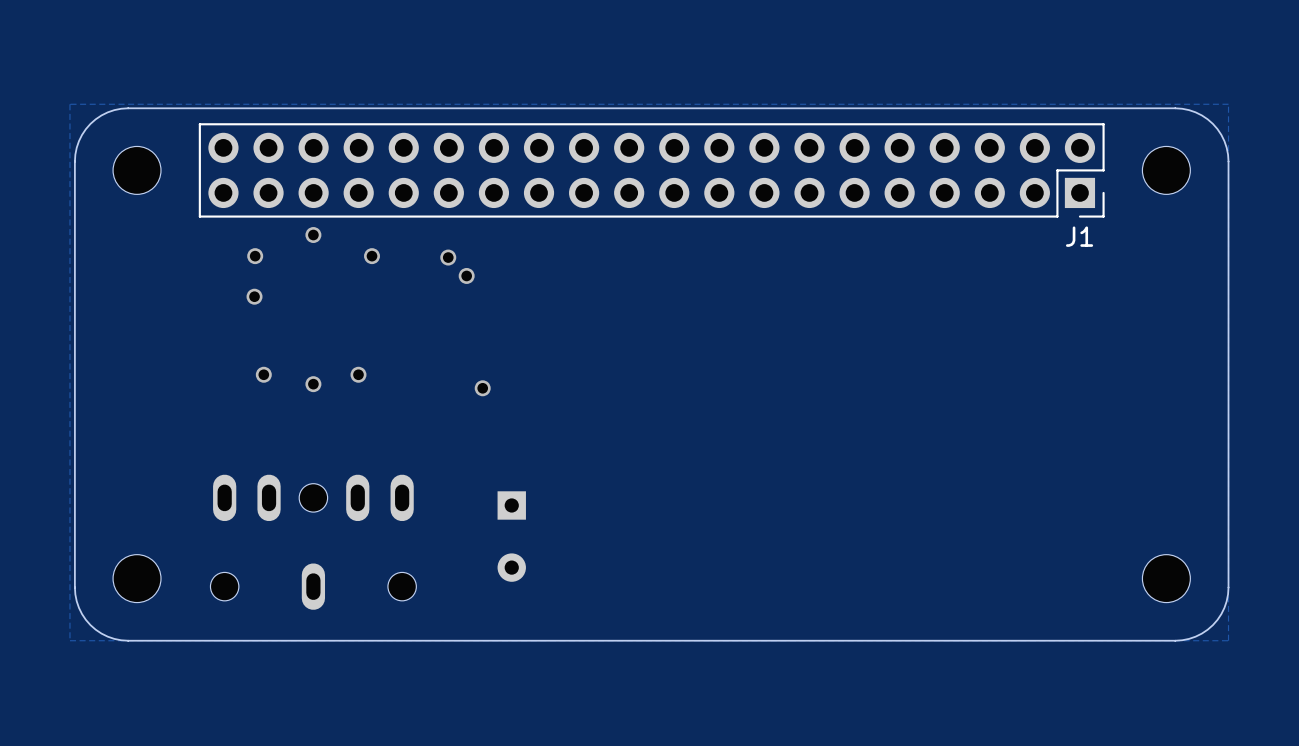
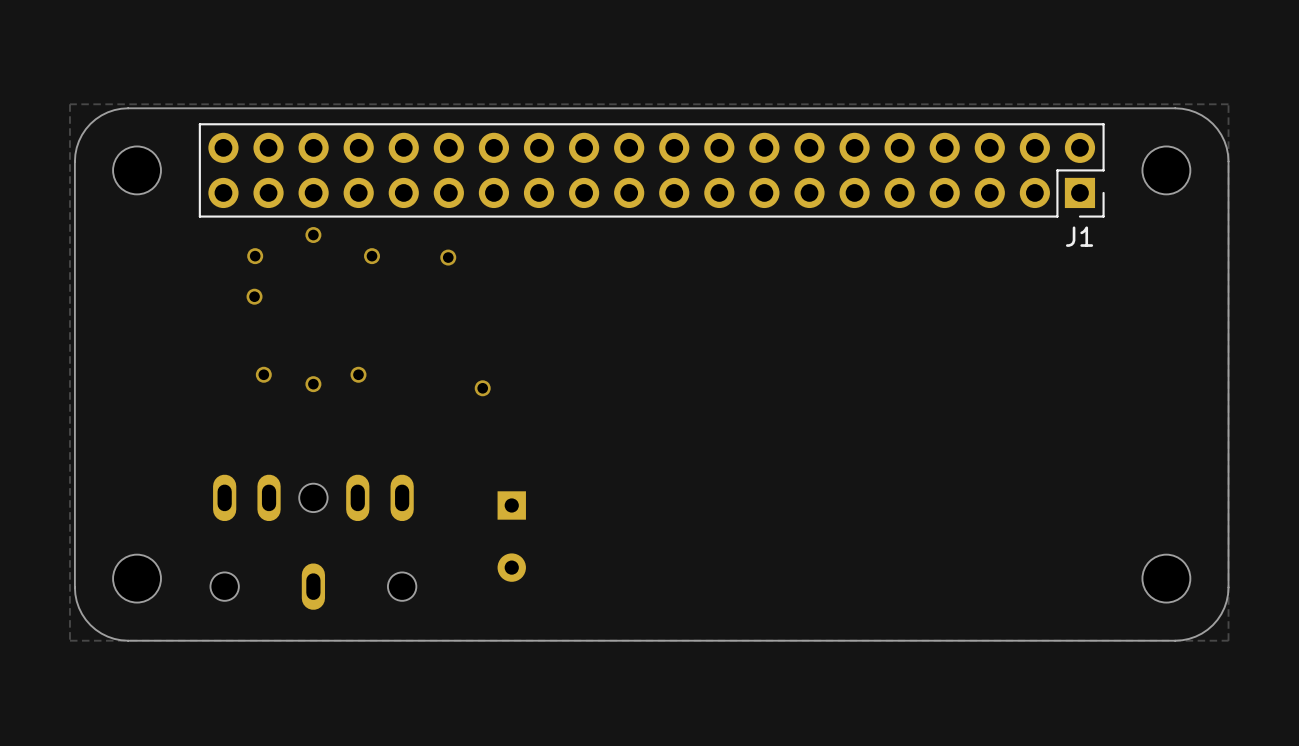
via: (466, 275) -> none

